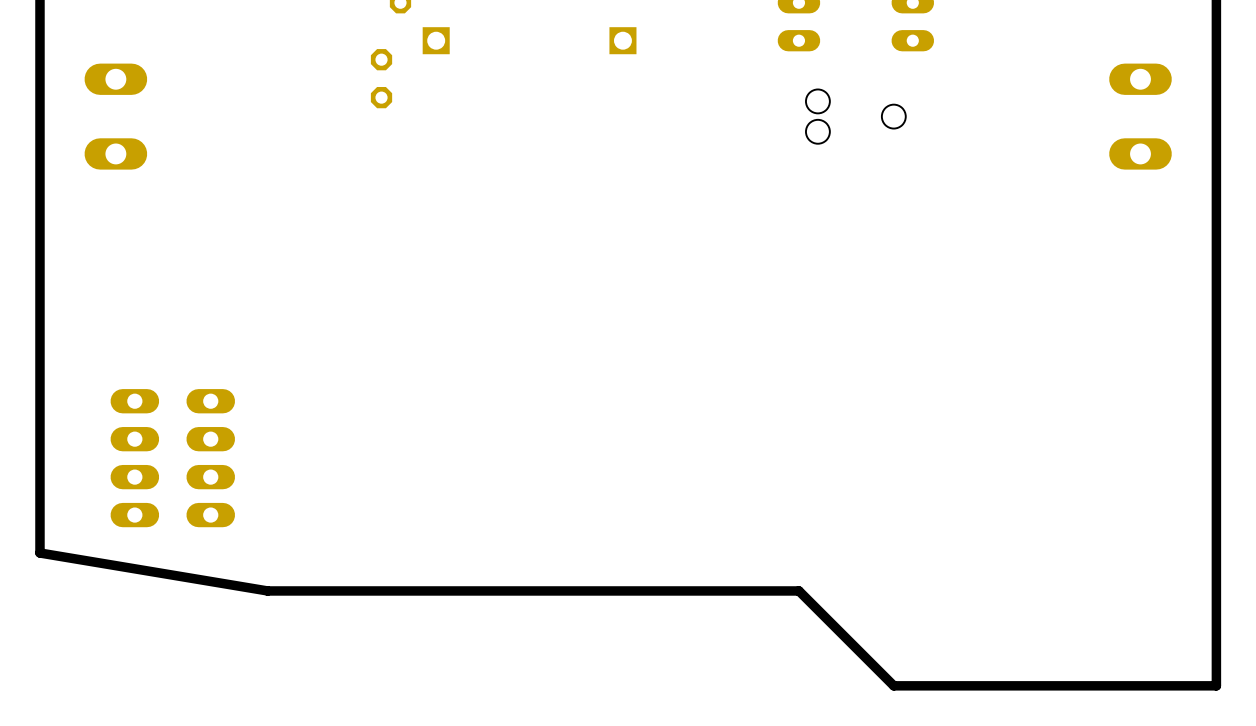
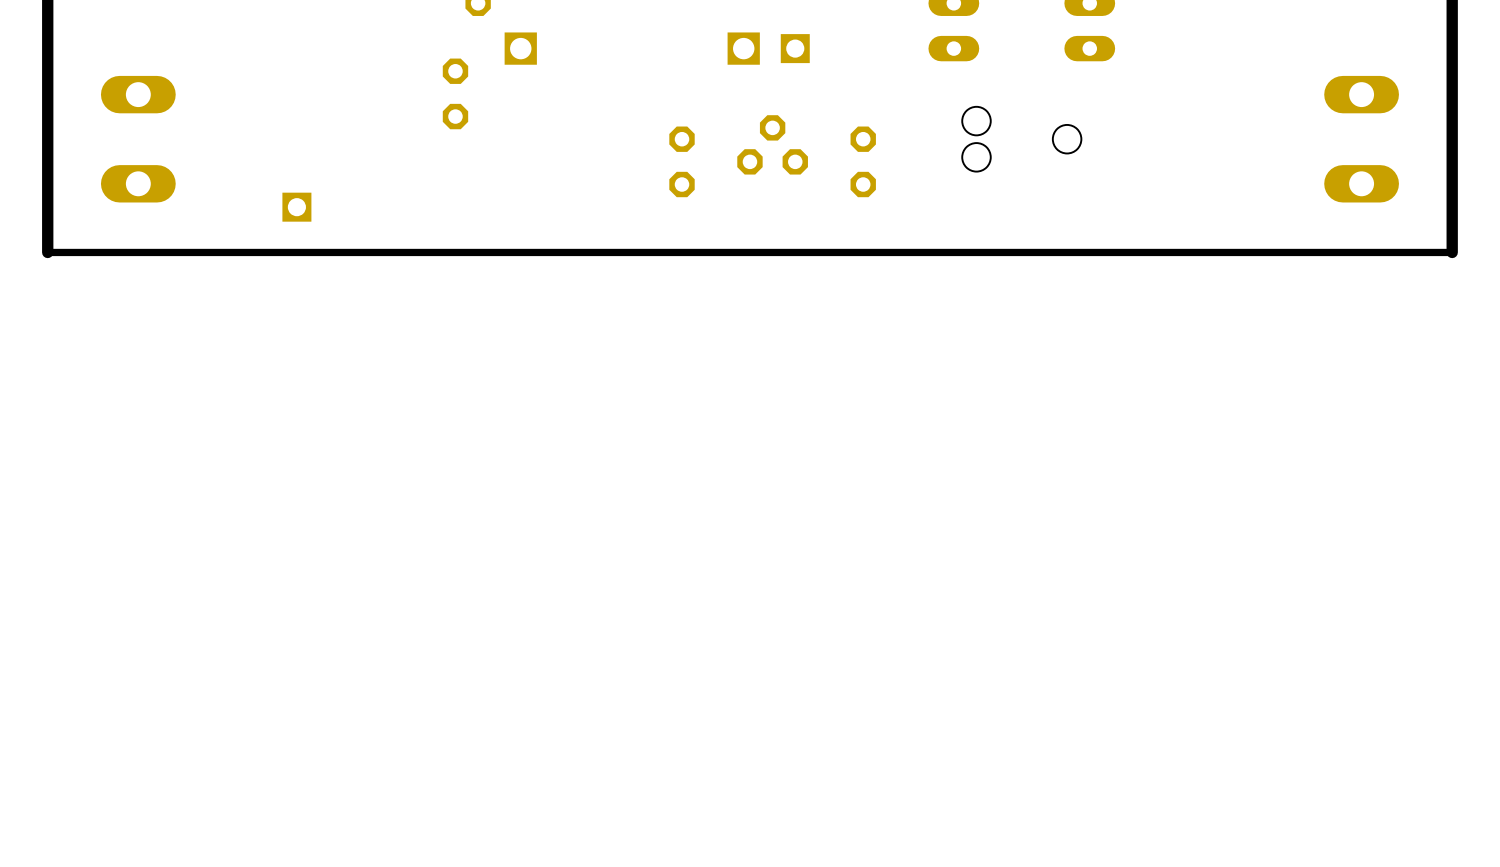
part: none -> (795, 48)
part: none -> (772, 144)
part: none -> (682, 161)
part: none -> (863, 161)
part: none -> (296, 207)
board edge: (1216, 211) (1216, 685) (893, 685) (798, 590) (267, 590) (39, 553) (39, 211) -> (1452, 252) (47, 252)
part: (134, 458) -> none
part: (210, 458) -> none

